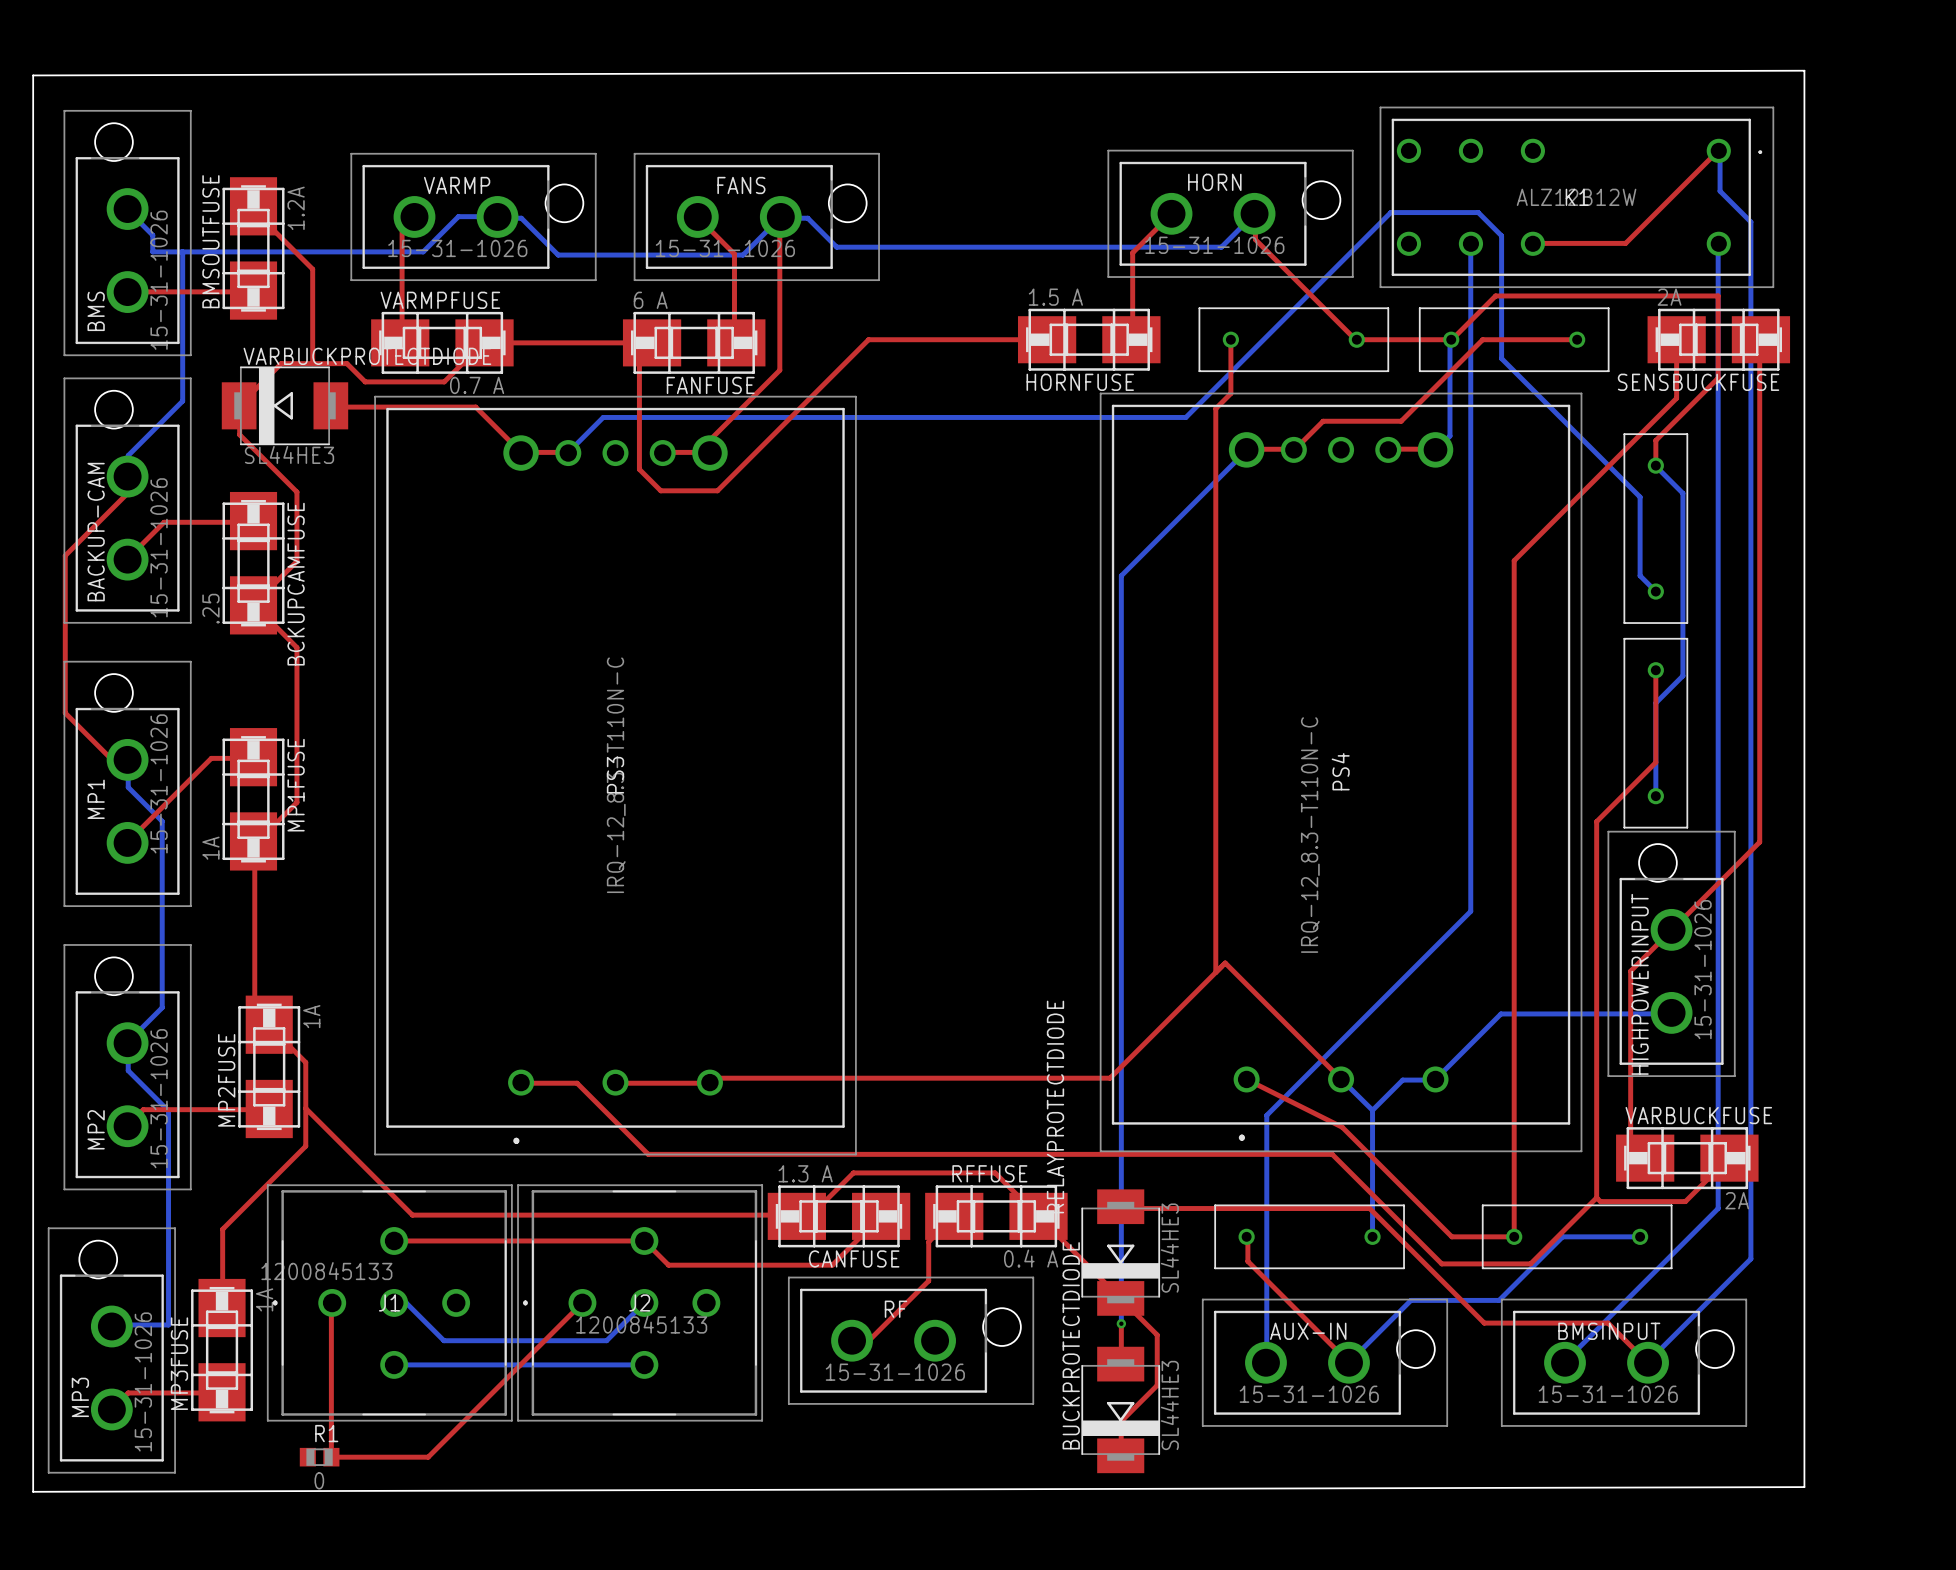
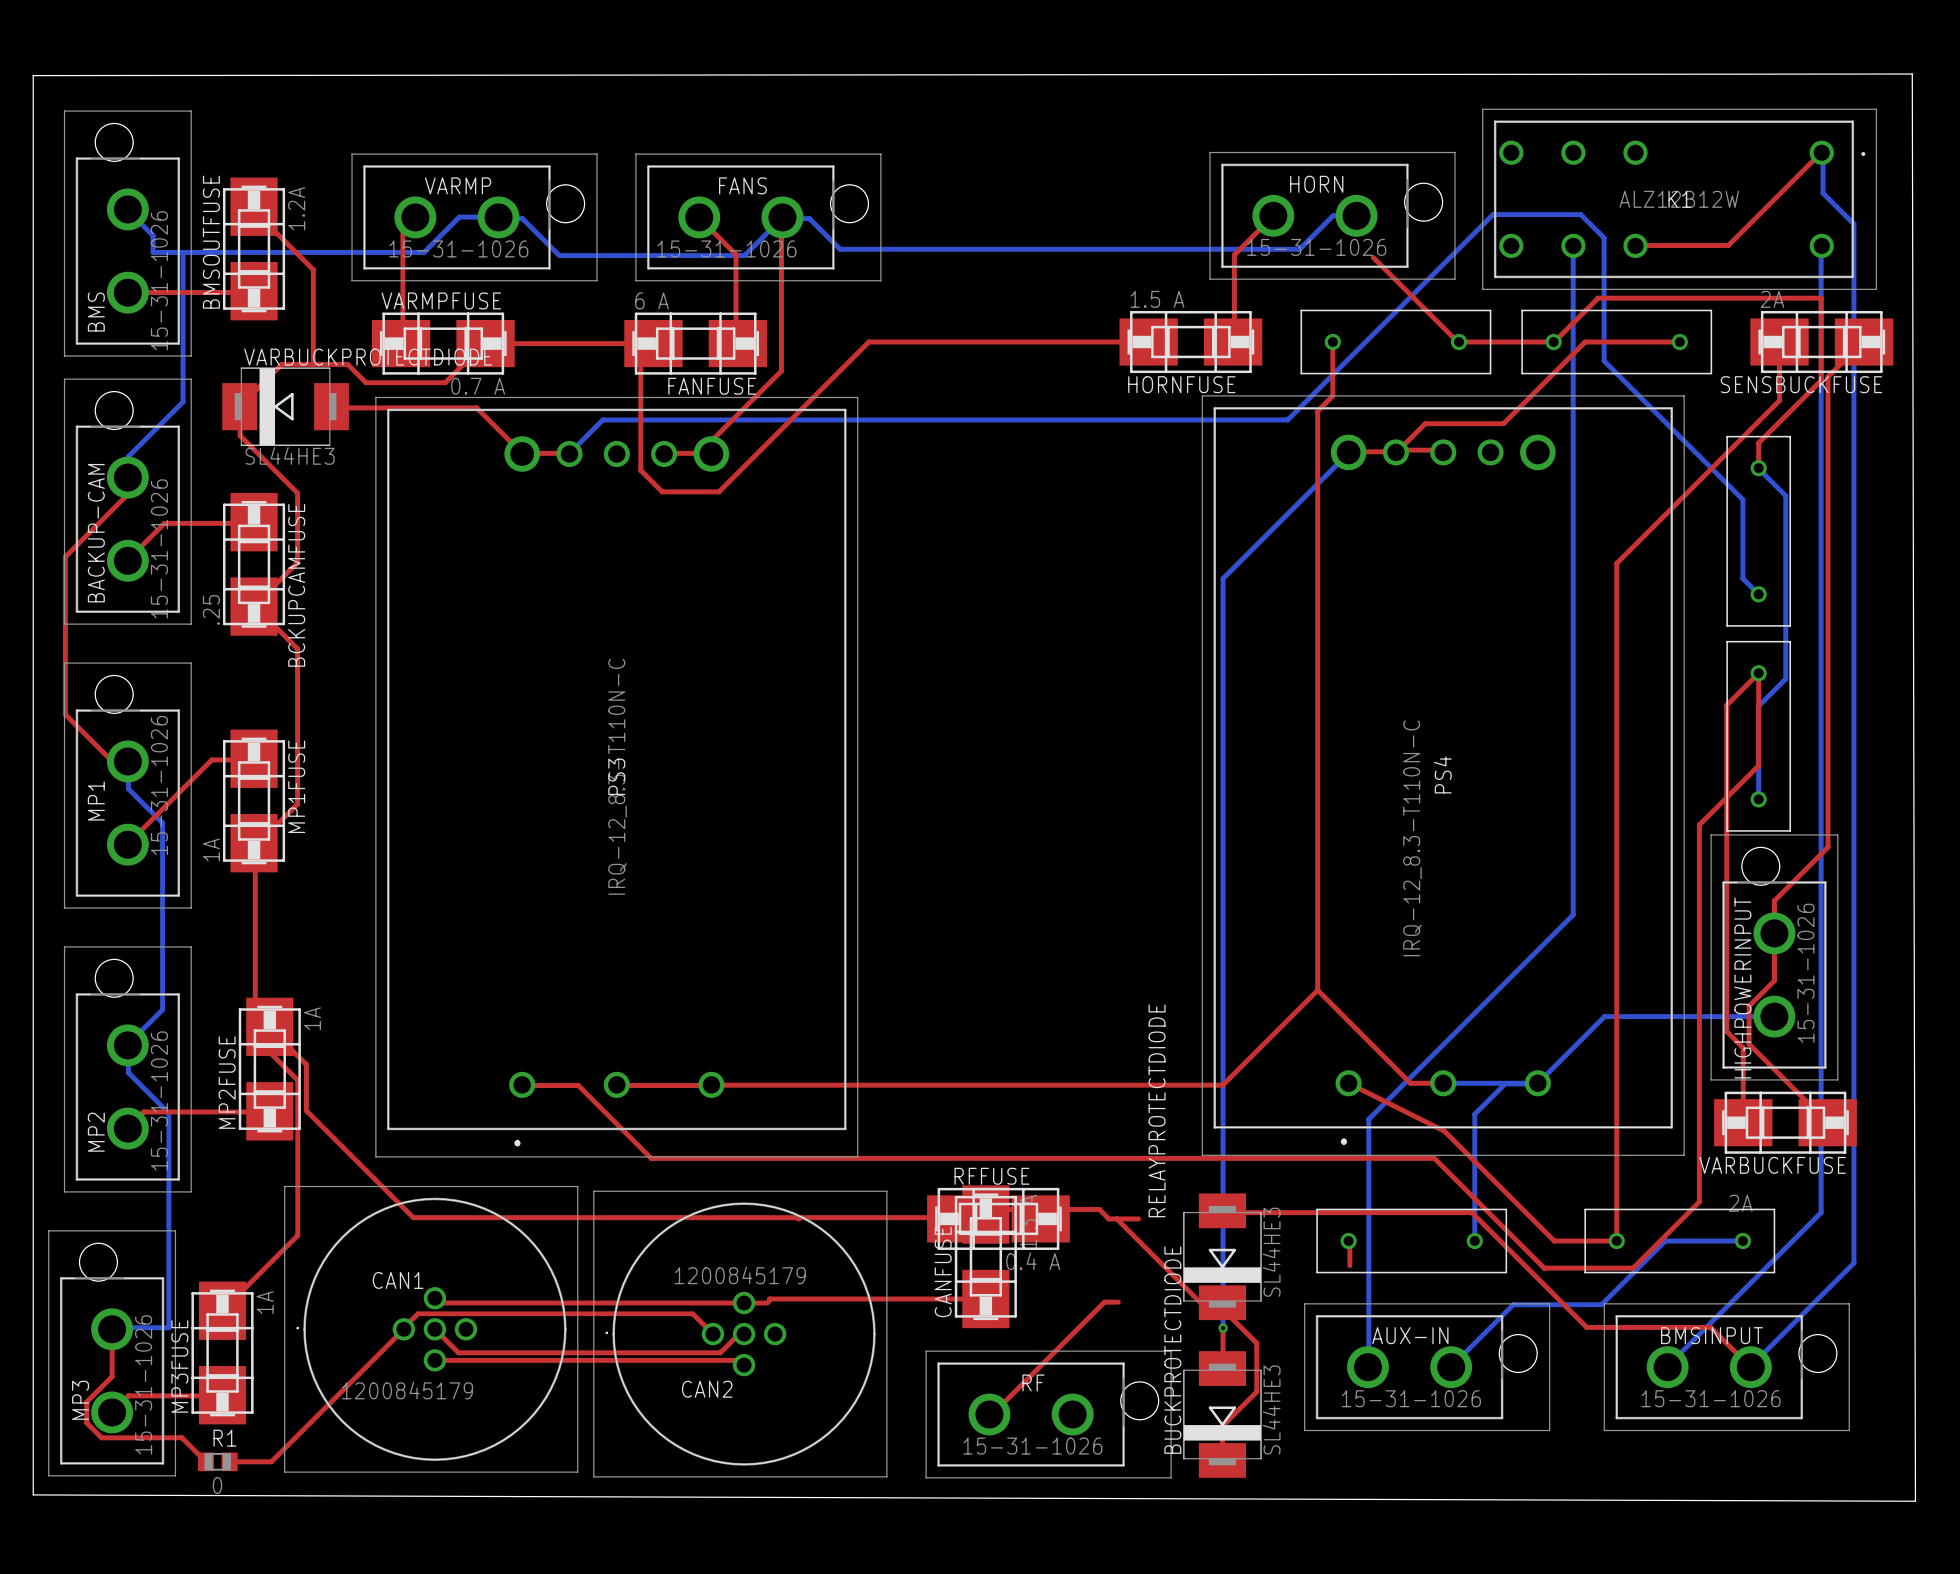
board edge: (33, 75) (1804, 70) (1804, 1487) (33, 1491) -> (33, 75) (1912, 74) (1915, 1501) (33, 1494)
top track: (1718, 150) (1625, 243) (1532, 243) -> (1821, 152) (1728, 245) (1635, 245)
bottom track: (1718, 150) (1720, 191) (1750, 221) (1750, 1258) (1648, 1362) -> (1821, 152) (1823, 193) (1853, 224) (1853, 1263) (1750, 1367)
K1 position: (1576, 197) -> (1679, 199)
top track: (1171, 213) (1132, 252) (1131, 339) -> (1273, 215) (1234, 254) (1233, 342)
HORN position: (1230, 213) -> (1332, 215)
top track: (1254, 213) (1255, 239) (1355, 339) (1451, 339) (1495, 295) (1718, 295) (1718, 378) (1655, 440) (1655, 465) -> none
bottom track: (1254, 213) (1221, 247) (836, 247) -> (1356, 215) (1333, 215) (1299, 249) (840, 249) (838, 247)
bottom track: (1470, 243) (1470, 911) (1266, 1115) (1265, 1362) -> none
bottom track: (1718, 243) (1718, 1208) (1565, 1362) -> (1821, 245) (1821, 1212) (1667, 1367)
top track: none -> (1373, 257) (1457, 342) (1554, 342) (1598, 298) (1821, 298) (1821, 380) (1758, 442) (1758, 468)
top track: (1047, 339) (868, 339) (867, 341) -> (1148, 342) (868, 342)
HORNFUSE position: (1089, 339) -> (1190, 342)
top track: (1230, 339) (1230, 393) (1215, 408) (1215, 972) -> none
part: (1293, 339) -> none
bottom track: (1451, 339) (1449, 436) (1435, 450) -> none
part: (1514, 339) -> none
top track: (1577, 339) (1482, 339) (1401, 421) (1323, 421) (1293, 449) (1246, 449) -> (1679, 342) (1585, 342) (1503, 423) (1425, 423) (1395, 452) (1348, 452)
top track: (1676, 339) (1676, 398) (1514, 560) (1514, 1236) (1451, 1236) (1342, 1127) (1246, 1079) -> (1779, 342) (1779, 400) (1616, 563) (1616, 1241) (1554, 1241) (1444, 1131) (1348, 1083)
SENSBUCKFUSE position: (1718, 339) -> (1821, 342)
top track: (1760, 339) (1759, 842) (1630, 971) (1630, 1143) (1645, 1158) -> none
top track: none -> (1332, 342) (1332, 395) (1317, 411) (1317, 990)
part: none -> (1395, 342)
part: none -> (1616, 342)
top track: none -> (1863, 342) (1827, 376) (1827, 847) (1774, 900) (1774, 980) (1749, 1006) (1749, 1044) (1827, 1122)
bottom track: (601, 419) (603, 417) (1185, 417) (1390, 212) (1478, 212) (1501, 235) (1501, 358) (1640, 497) (1640, 575) (1655, 591) -> (602, 419) (1287, 419) (1493, 214) (1580, 214) (1604, 237) (1604, 360) (1742, 499) (1742, 578) (1758, 594)
bottom track: (1246, 449) (1121, 575) (1121, 1323) -> (1348, 452) (1223, 578) (1223, 1328)
bottom track: (1655, 465) (1682, 493) (1682, 675) (1655, 702) (1655, 796) -> (1758, 468) (1785, 495) (1785, 678) (1758, 706) (1758, 799)
part: (1655, 528) -> none
part: none -> (1758, 531)
top track: (1655, 670) (1655, 762) (1596, 821) (1596, 1197) -> none
part position: (1655, 733) -> (1758, 736)
PS4 position: (1341, 772) -> (1443, 775)
HIGHPOWERINPUT position: (1671, 953) -> (1774, 957)
top track: none -> (1317, 990) (1410, 1083) (1443, 1083)
bottom track: (1671, 1013) (1500, 1013) (1434, 1080) (1402, 1080) -> (1573, 245) (1573, 914) (1405, 1082)
bottom track: none -> (1774, 1016) (1604, 1016) (1537, 1083)
top track: (1341, 1079) (1225, 962) (1110, 1078) (709, 1078) (709, 1082) -> (1317, 990) (1222, 1085) (711, 1084)
bottom track: (1341, 1079) (1372, 1110) (1372, 1236) -> none
bottom track: none -> (1443, 1083) (1537, 1083)
bottom track: none -> (1537, 1083) (1505, 1083) (1474, 1114) (1474, 1241)
top track: (305, 1108) (305, 1146) (222, 1229) (222, 1308) -> (270, 1028) (270, 1052) (297, 1080) (297, 1235) (222, 1310)
bottom track: none -> (1375, 1112) (1368, 1119) (1367, 1367)
VARBUCKFUSE name position: VARBUCKFUSE (1698, 1115) -> VARBUCKFUSE (1772, 1165)
top track: (648, 1154) (1332, 1154) (1441, 1263) (1530, 1263) (1596, 1197) -> (649, 1156) (651, 1158) (1434, 1158) (1544, 1268) (1633, 1268) (1699, 1201) (1699, 824) (1758, 765) (1758, 673) (1726, 705) (1726, 1031) (1743, 1047) (1743, 1122)
VARBUCKFUSE position: (1687, 1158) -> (1785, 1122)
top track: (1729, 1158) (1685, 1201) (1600, 1201) (1596, 1197) -> none
top track: (1120, 1206) (1121, 1208) (1369, 1208) (1484, 1323) (1608, 1323) (1648, 1362) -> (1222, 1210) (1223, 1212) (1471, 1212) (1586, 1327) (1710, 1327) (1750, 1367)
top track: (811, 1215) (853, 1172) (995, 1172) (1157, 1335) (1157, 1385) (1121, 1421) (1121, 1455) -> (813, 1217) (982, 1217) (990, 1209) (1099, 1209) (1108, 1218)
CANFUSE rotation: 0° (839, 1216) -> 90° clockwise (985, 1256)
CANFUSE position: (839, 1216) -> (985, 1256)
top track: (881, 1216) (832, 1265) (668, 1265) (644, 1240) (394, 1240) -> none
top track: none -> (1108, 1218) (1138, 1218) (1108, 1218)
top track: none -> (1116, 1218) (1200, 1302) (1222, 1302) (1222, 1308) (1256, 1343) (1256, 1391) (1222, 1426) (1222, 1460)
top track: (954, 1217) (928, 1241) (928, 1280) (868, 1340) (852, 1340) -> none
top track: (1246, 1236) (1247, 1261) (1349, 1362) -> none
part: (1309, 1236) -> none
part: (1577, 1236) -> none
bottom track: (1640, 1236) (1562, 1236) (1499, 1300) (1410, 1300) (1348, 1362) -> none
top track: none -> (1348, 1241) (1349, 1265)
part: none -> (1411, 1241)
part: none -> (1679, 1241)
bottom track: none -> (1742, 1241) (1665, 1241) (1601, 1304) (1513, 1304) (1451, 1367)
RELAYPROTECTDIODE position: (1120, 1252) -> (1222, 1256)
top track: none -> (434, 1298) (439, 1303) (767, 1303) (769, 1299) (985, 1299)
top track: none -> (1118, 1302) (1104, 1302) (992, 1414) (989, 1414)
top track: (332, 1302) (331, 1457) (428, 1457) (582, 1302) -> none
J1: 1200845133 (389, 1302) -> none
bottom track: (394, 1302) (406, 1302) (443, 1340) (606, 1340) (644, 1302) -> none
J2: 1200845133 (640, 1302) -> none
top track: (1121, 1323) (1120, 1364) -> (1223, 1328) (1222, 1368)
via: (1121, 1323) -> none
via: none -> (1223, 1328)
top track: none -> (112, 1329) (112, 1376) (86, 1401) (86, 1422) (101, 1437) (181, 1437) (205, 1461)
CAN1: none -> 1200845179 (431, 1329)
top track: none -> (435, 1329) (458, 1352) (720, 1352) (739, 1334) (744, 1334)
top track: none -> (713, 1334) (692, 1313) (418, 1313) (271, 1461) (229, 1461)
CAN2: none -> 1200845179 (740, 1334)
RF position: (911, 1340) -> (1048, 1414)
top track: none -> (434, 1360) (739, 1360) (744, 1365)
AUX-IN position: (1324, 1362) -> (1427, 1367)
BMSINPUT position: (1624, 1362) -> (1726, 1367)
bottom track: (394, 1364) (644, 1364) -> none
BUCKPROTECTDIODE position: (1120, 1409) -> (1222, 1414)
R1 position: (319, 1457) -> (217, 1461)

